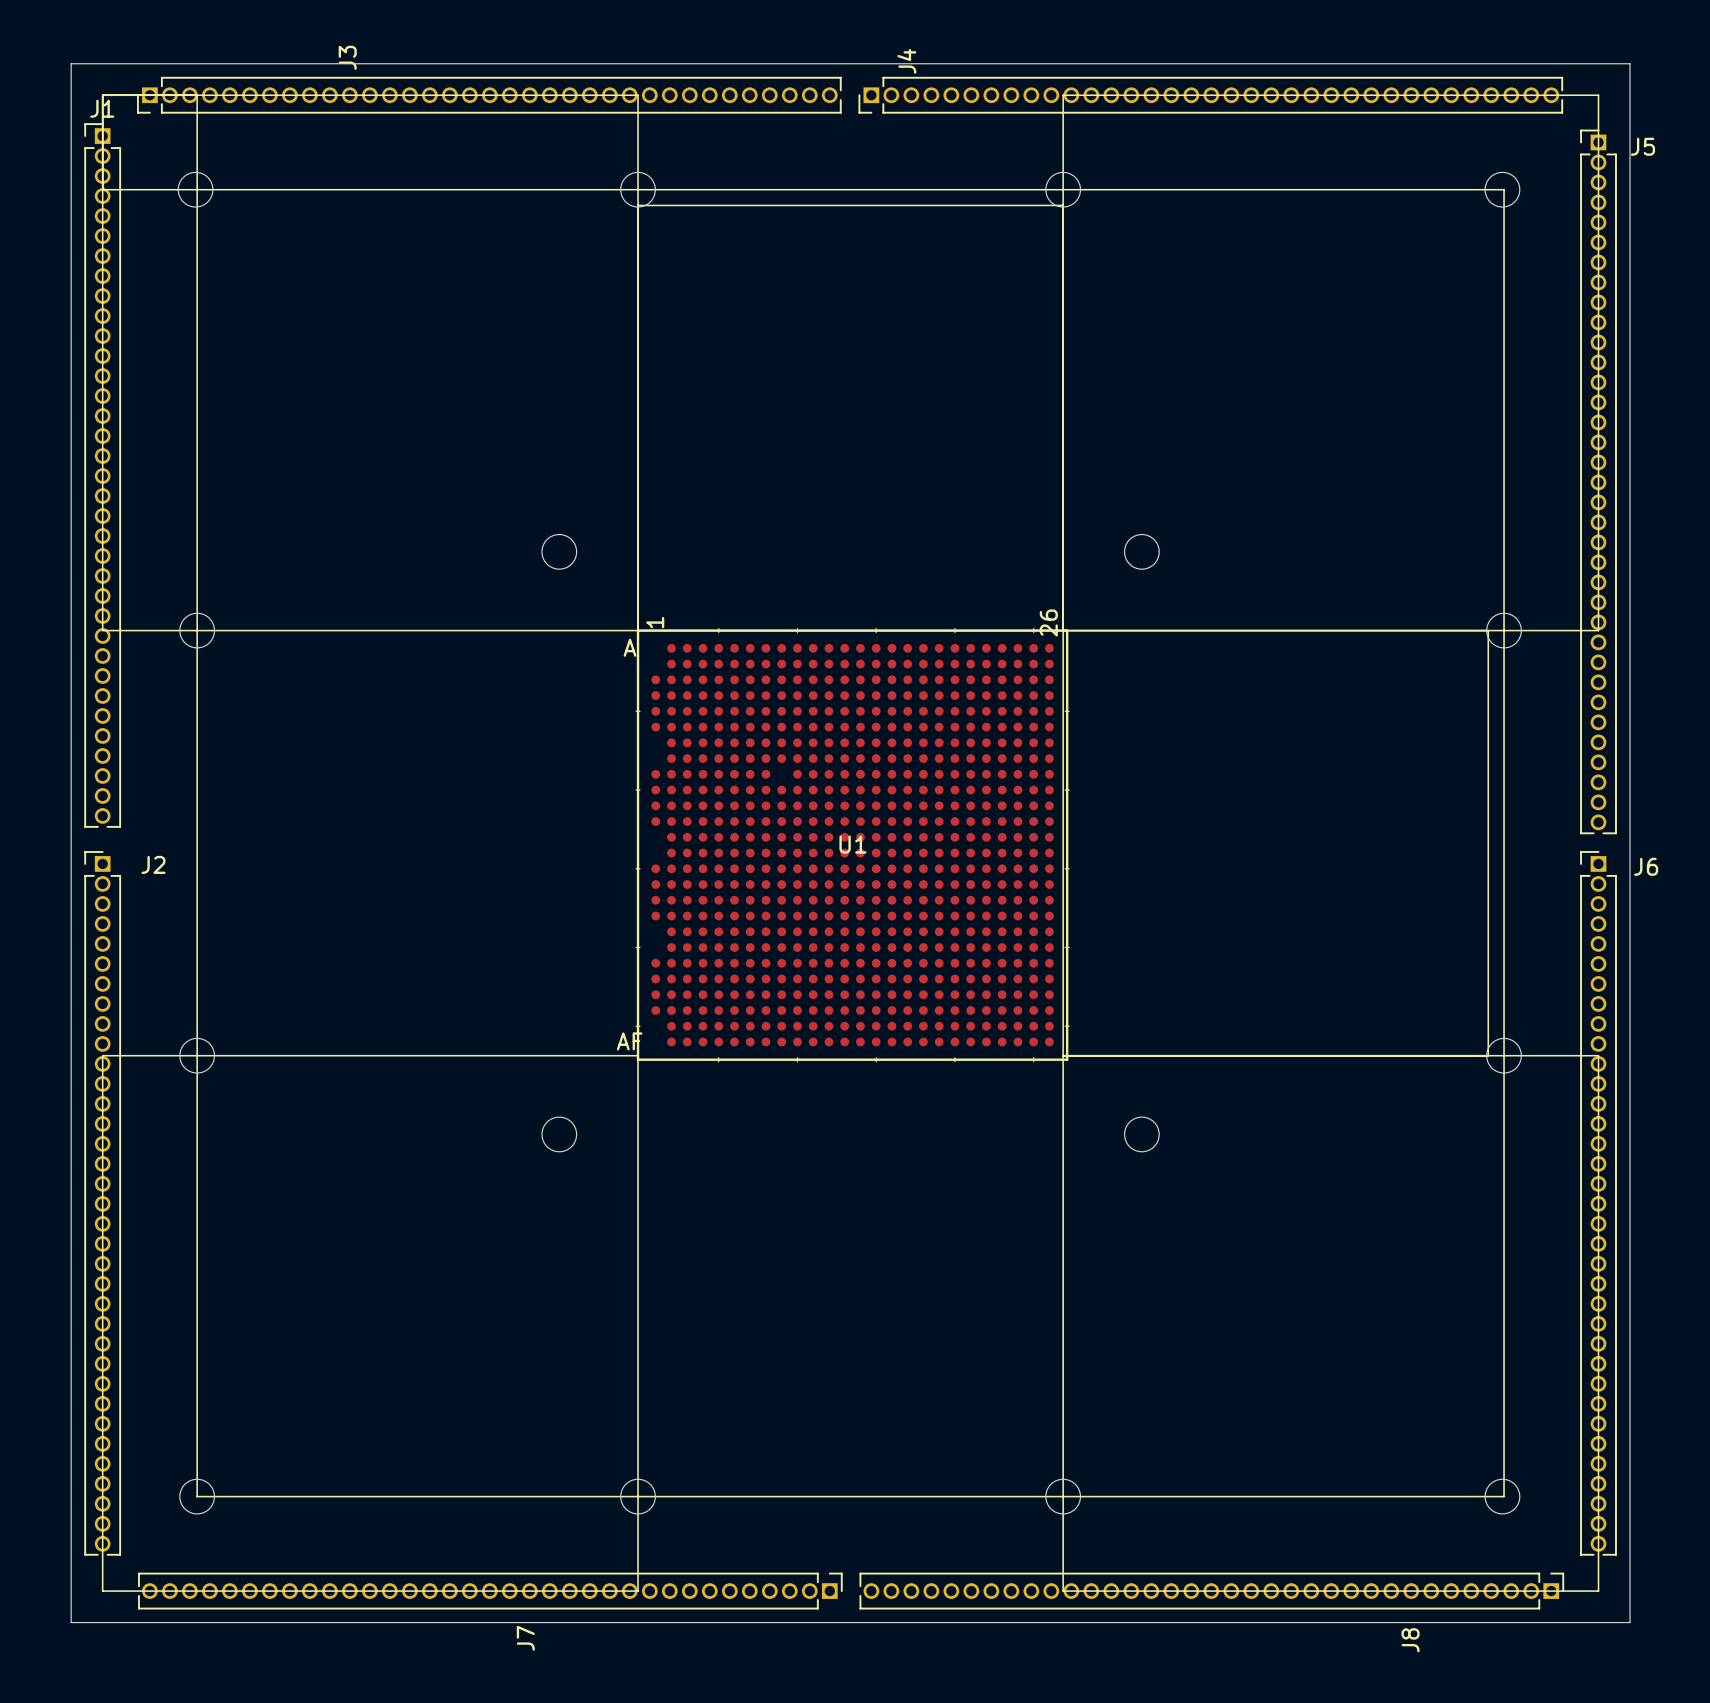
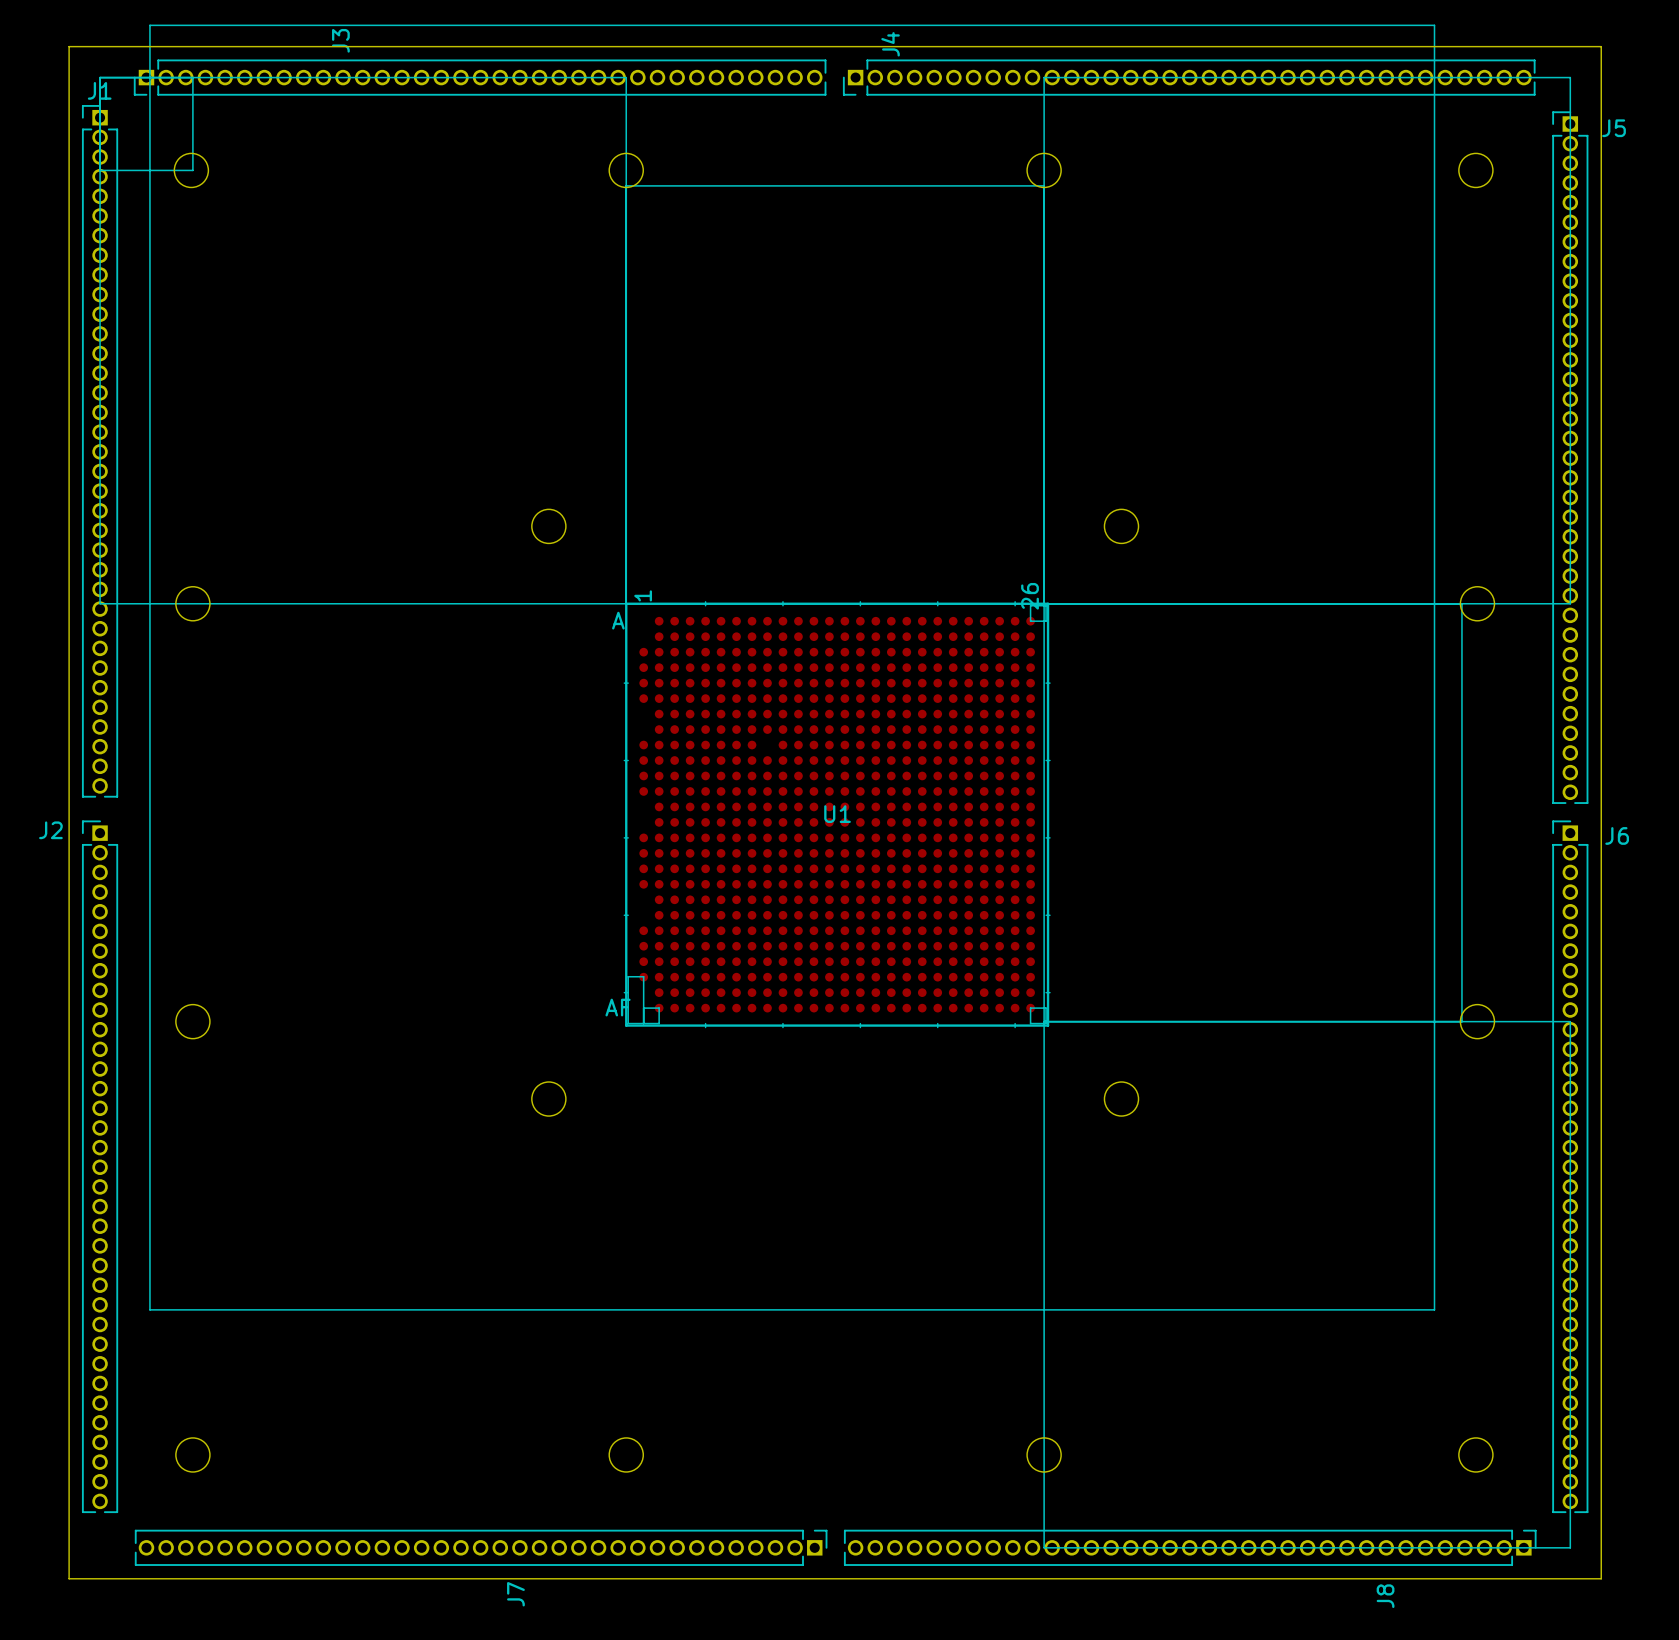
line: (197, 189) (1504, 189) (1504, 1496) (197, 1496) (197, 189) -> (149, 25) (149, 1309) (1434, 1309) (1434, 25) (149, 25)
line: none -> (1030, 605) (1046, 605) (1046, 621) (1030, 621) (1030, 605)
J2 name position: J2 (153, 864) -> J2 (50, 830)
line: none -> (643, 1008) (659, 1008) (659, 1023) (628, 1023) (628, 976) (643, 976) (643, 1023)
line: none -> (1030, 1008) (1046, 1008) (1046, 1023) (1030, 1023) (1030, 1008)
line: (102, 1055) (638, 1055) (638, 1591) (102, 1591) (102, 1055) -> none

